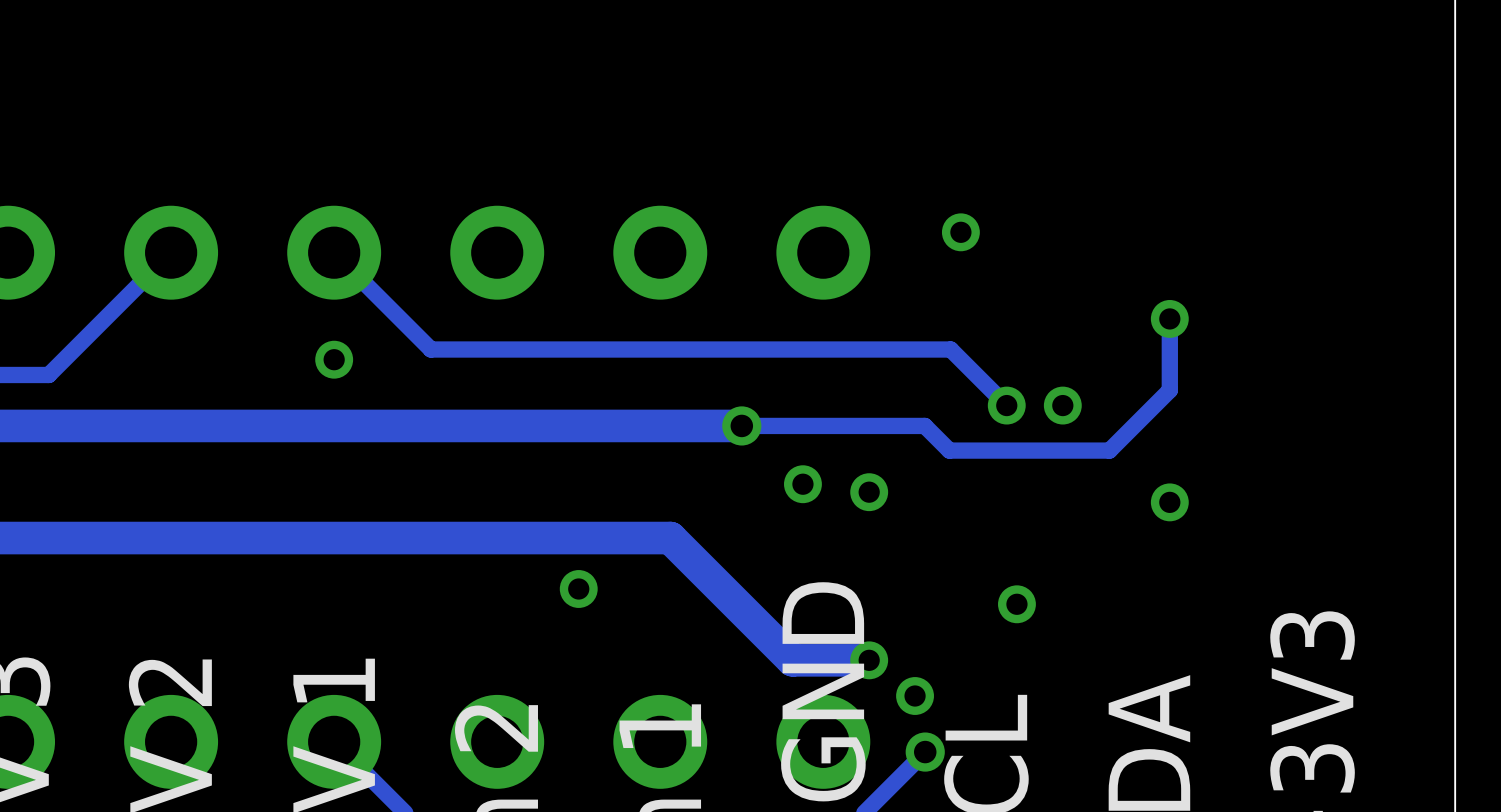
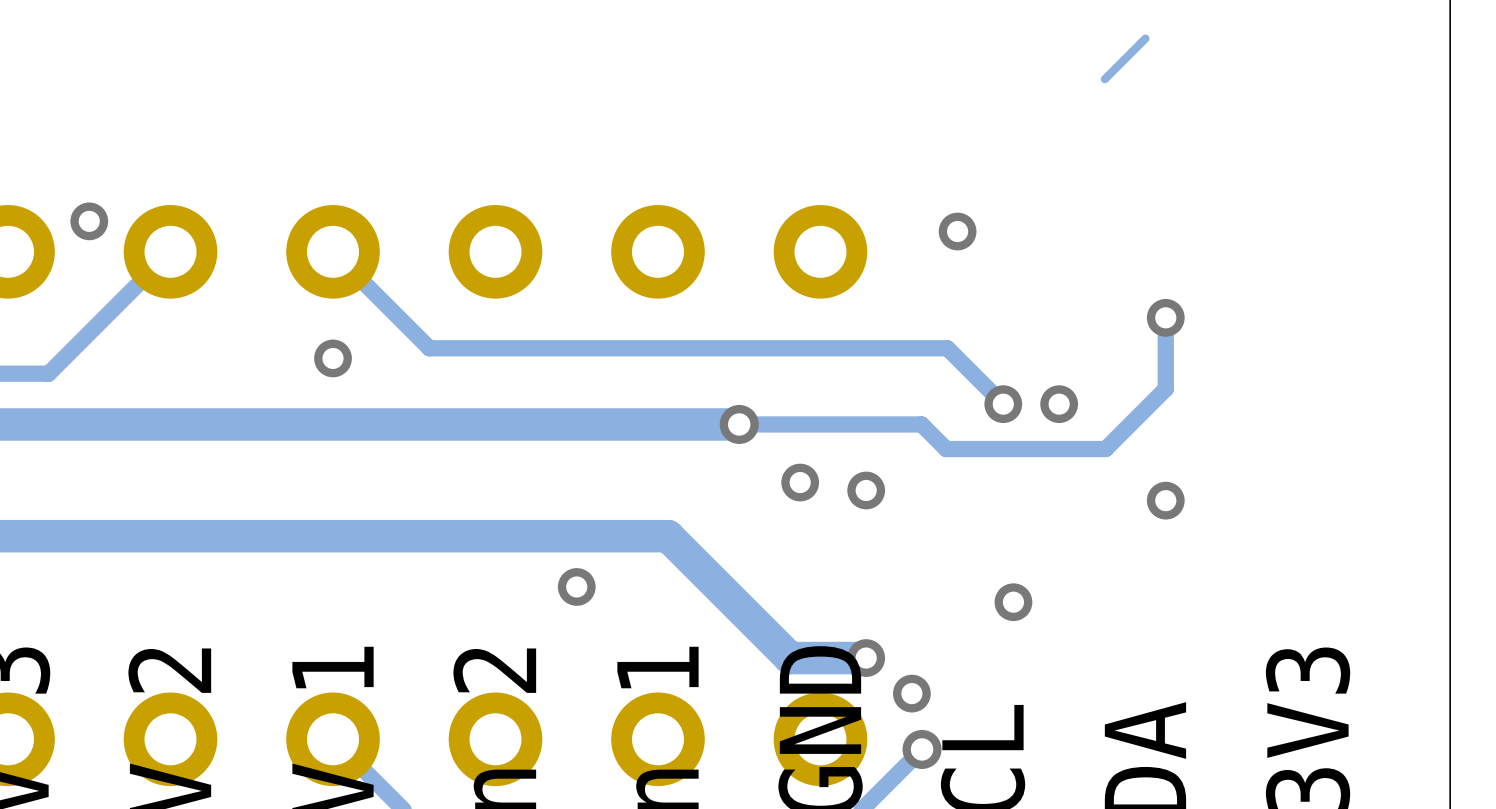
track: none -> (1145, 38) (1104, 79)
via: none -> (89, 221)

